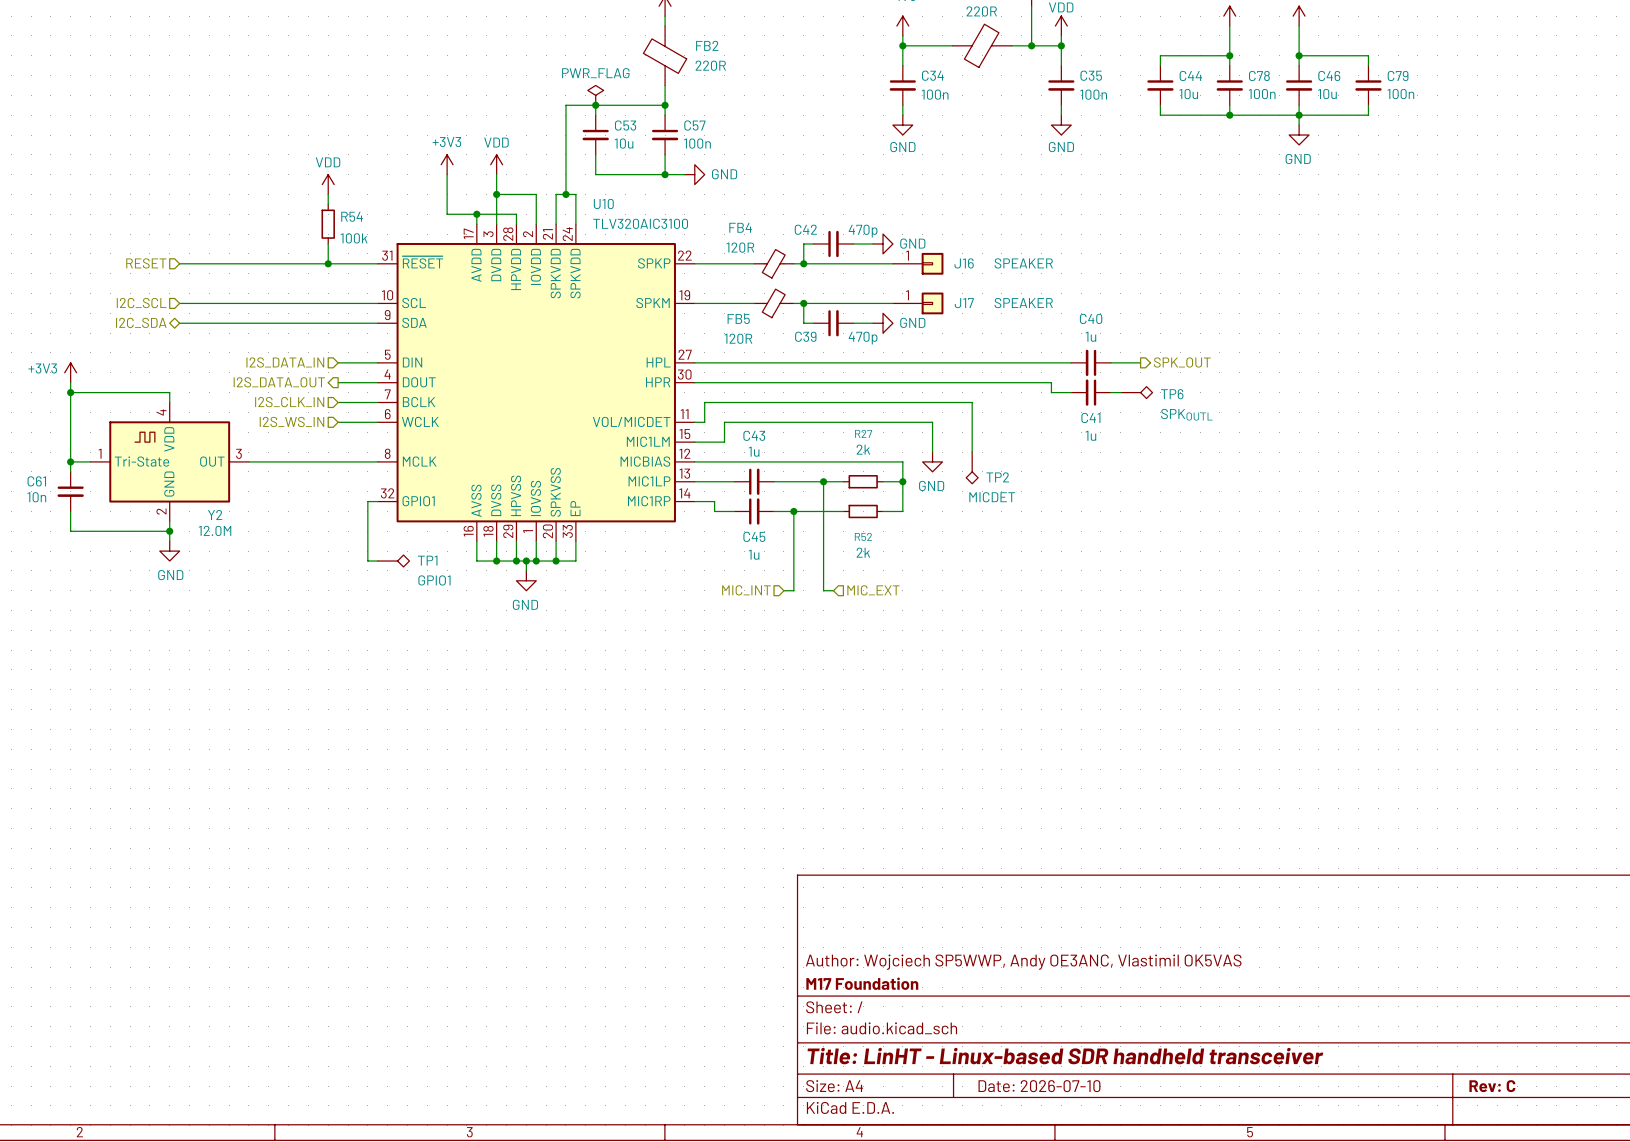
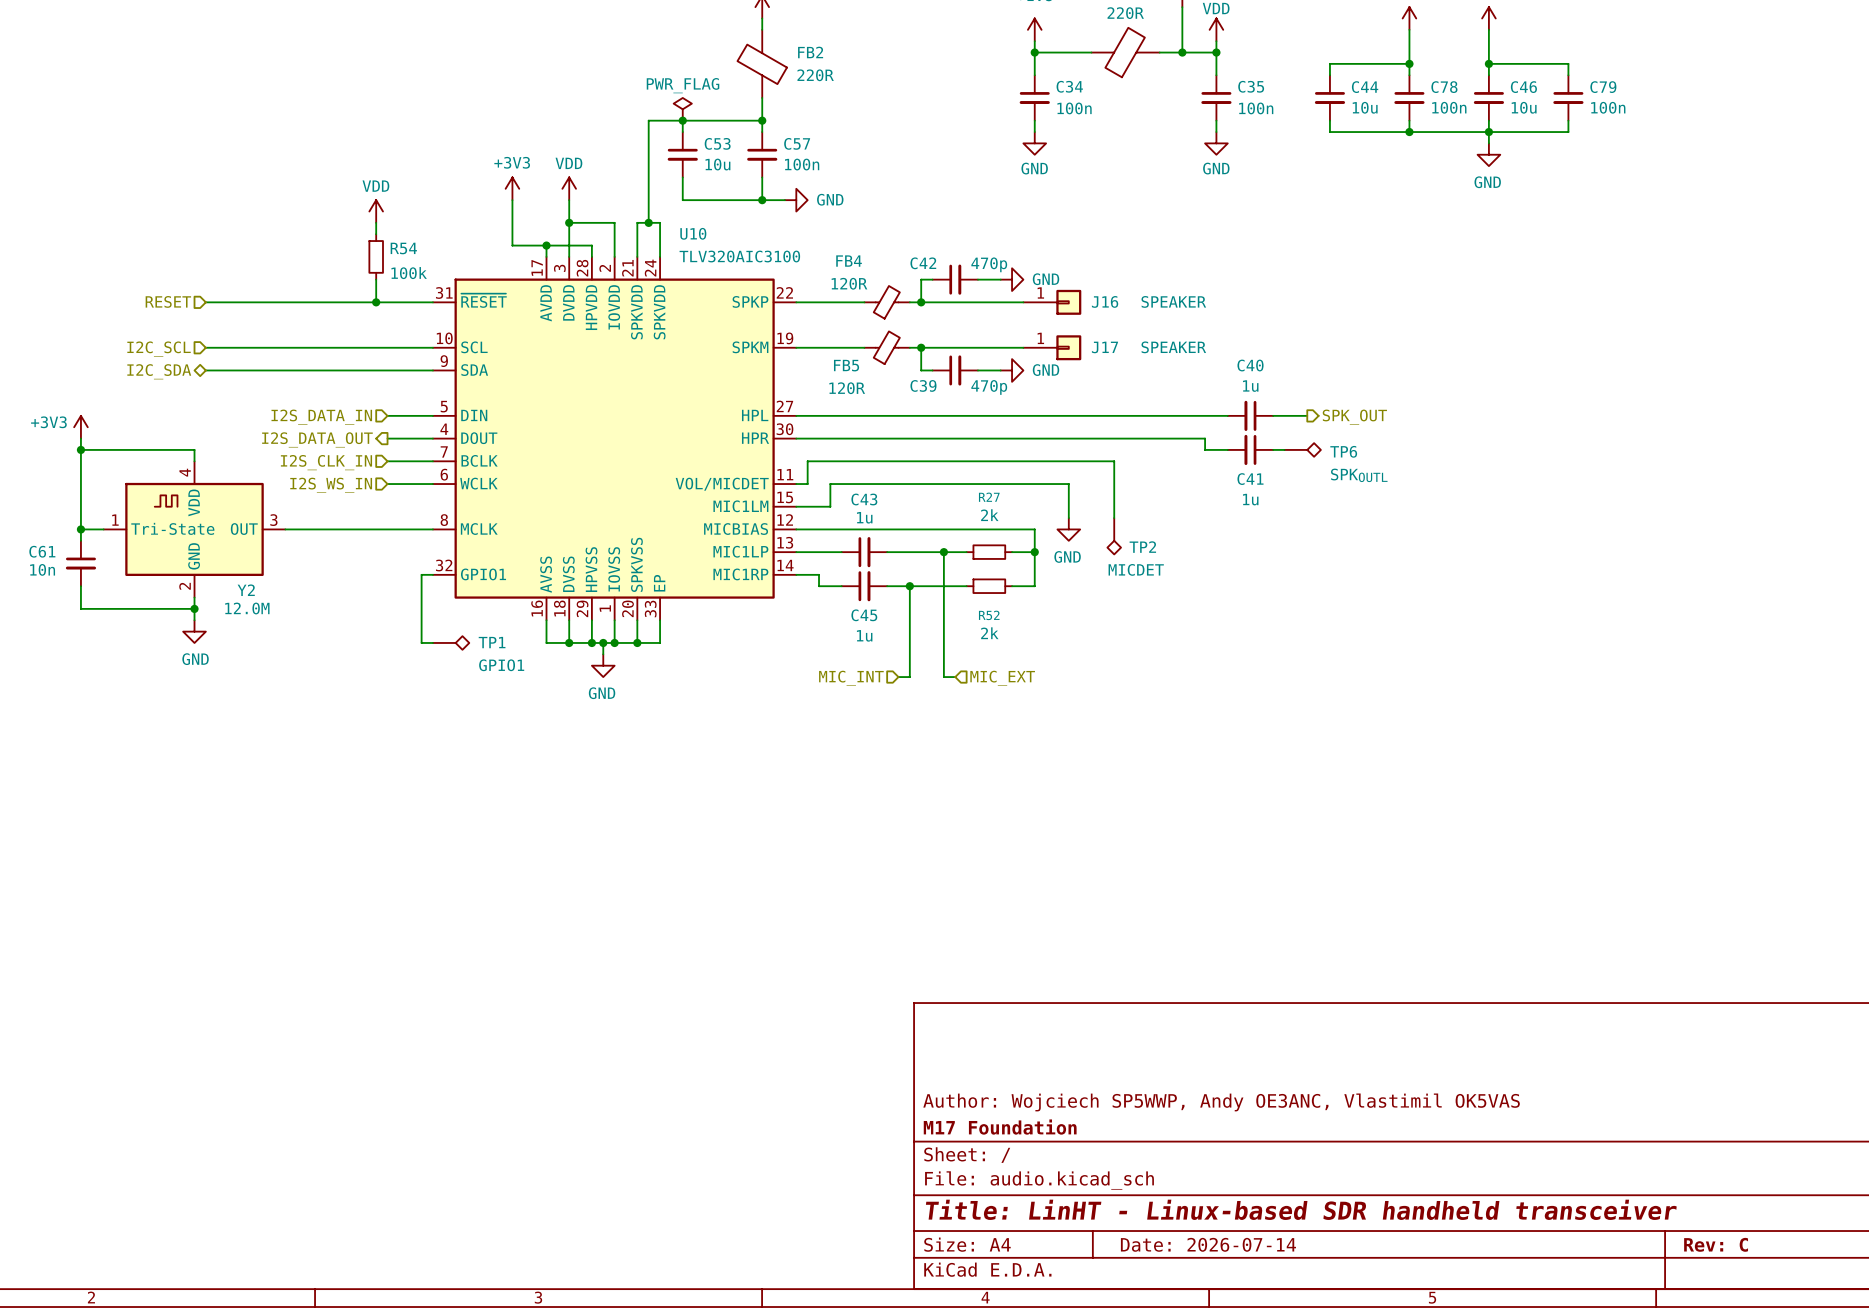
title block: Date: 2026-07-10 (1039, 1086) -> Date: 2026-07-14 (1208, 1244)

